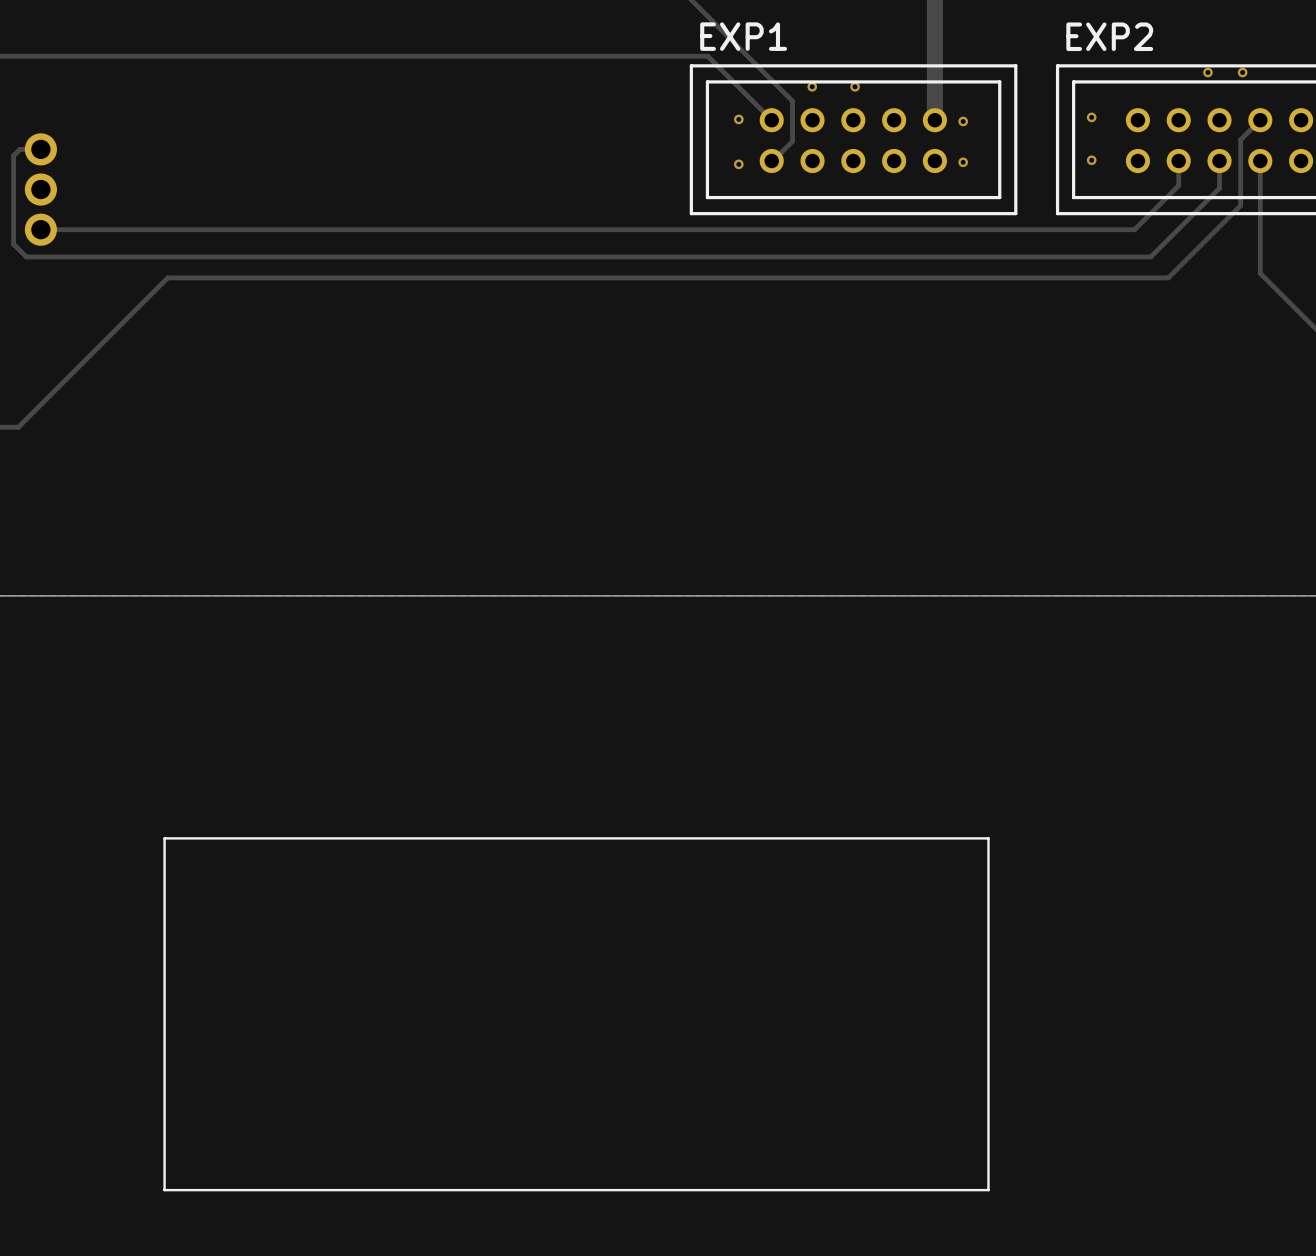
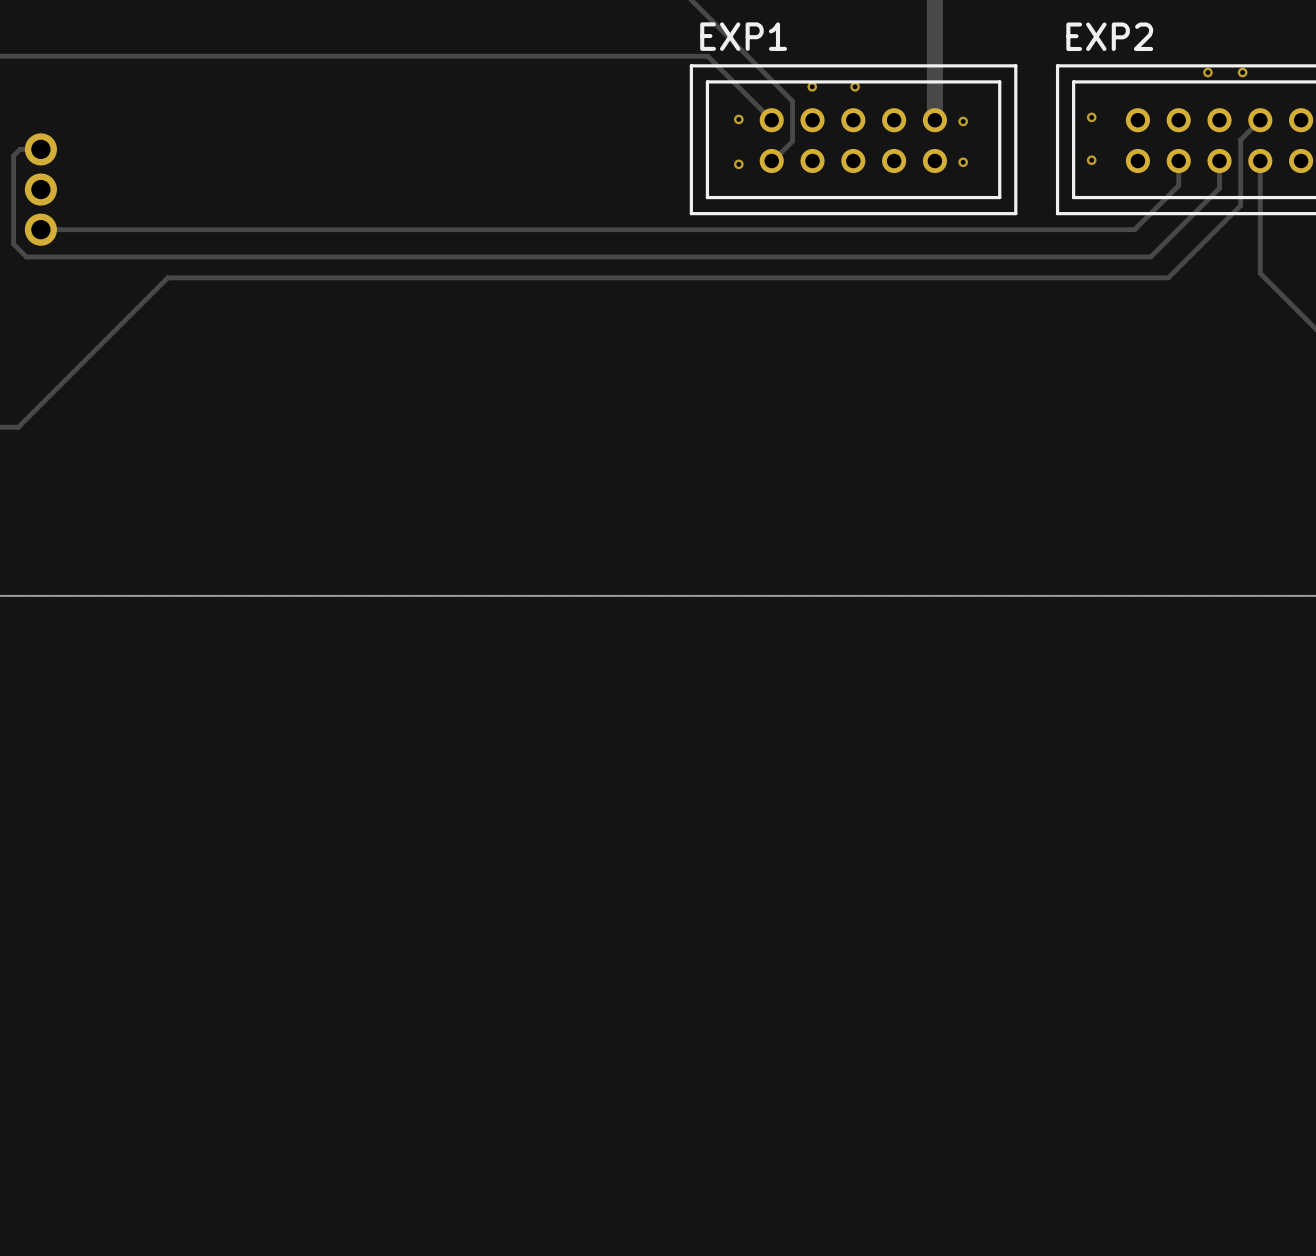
line: (164, 838) (988, 838) (988, 1190) (164, 1190) (164, 838) -> none

